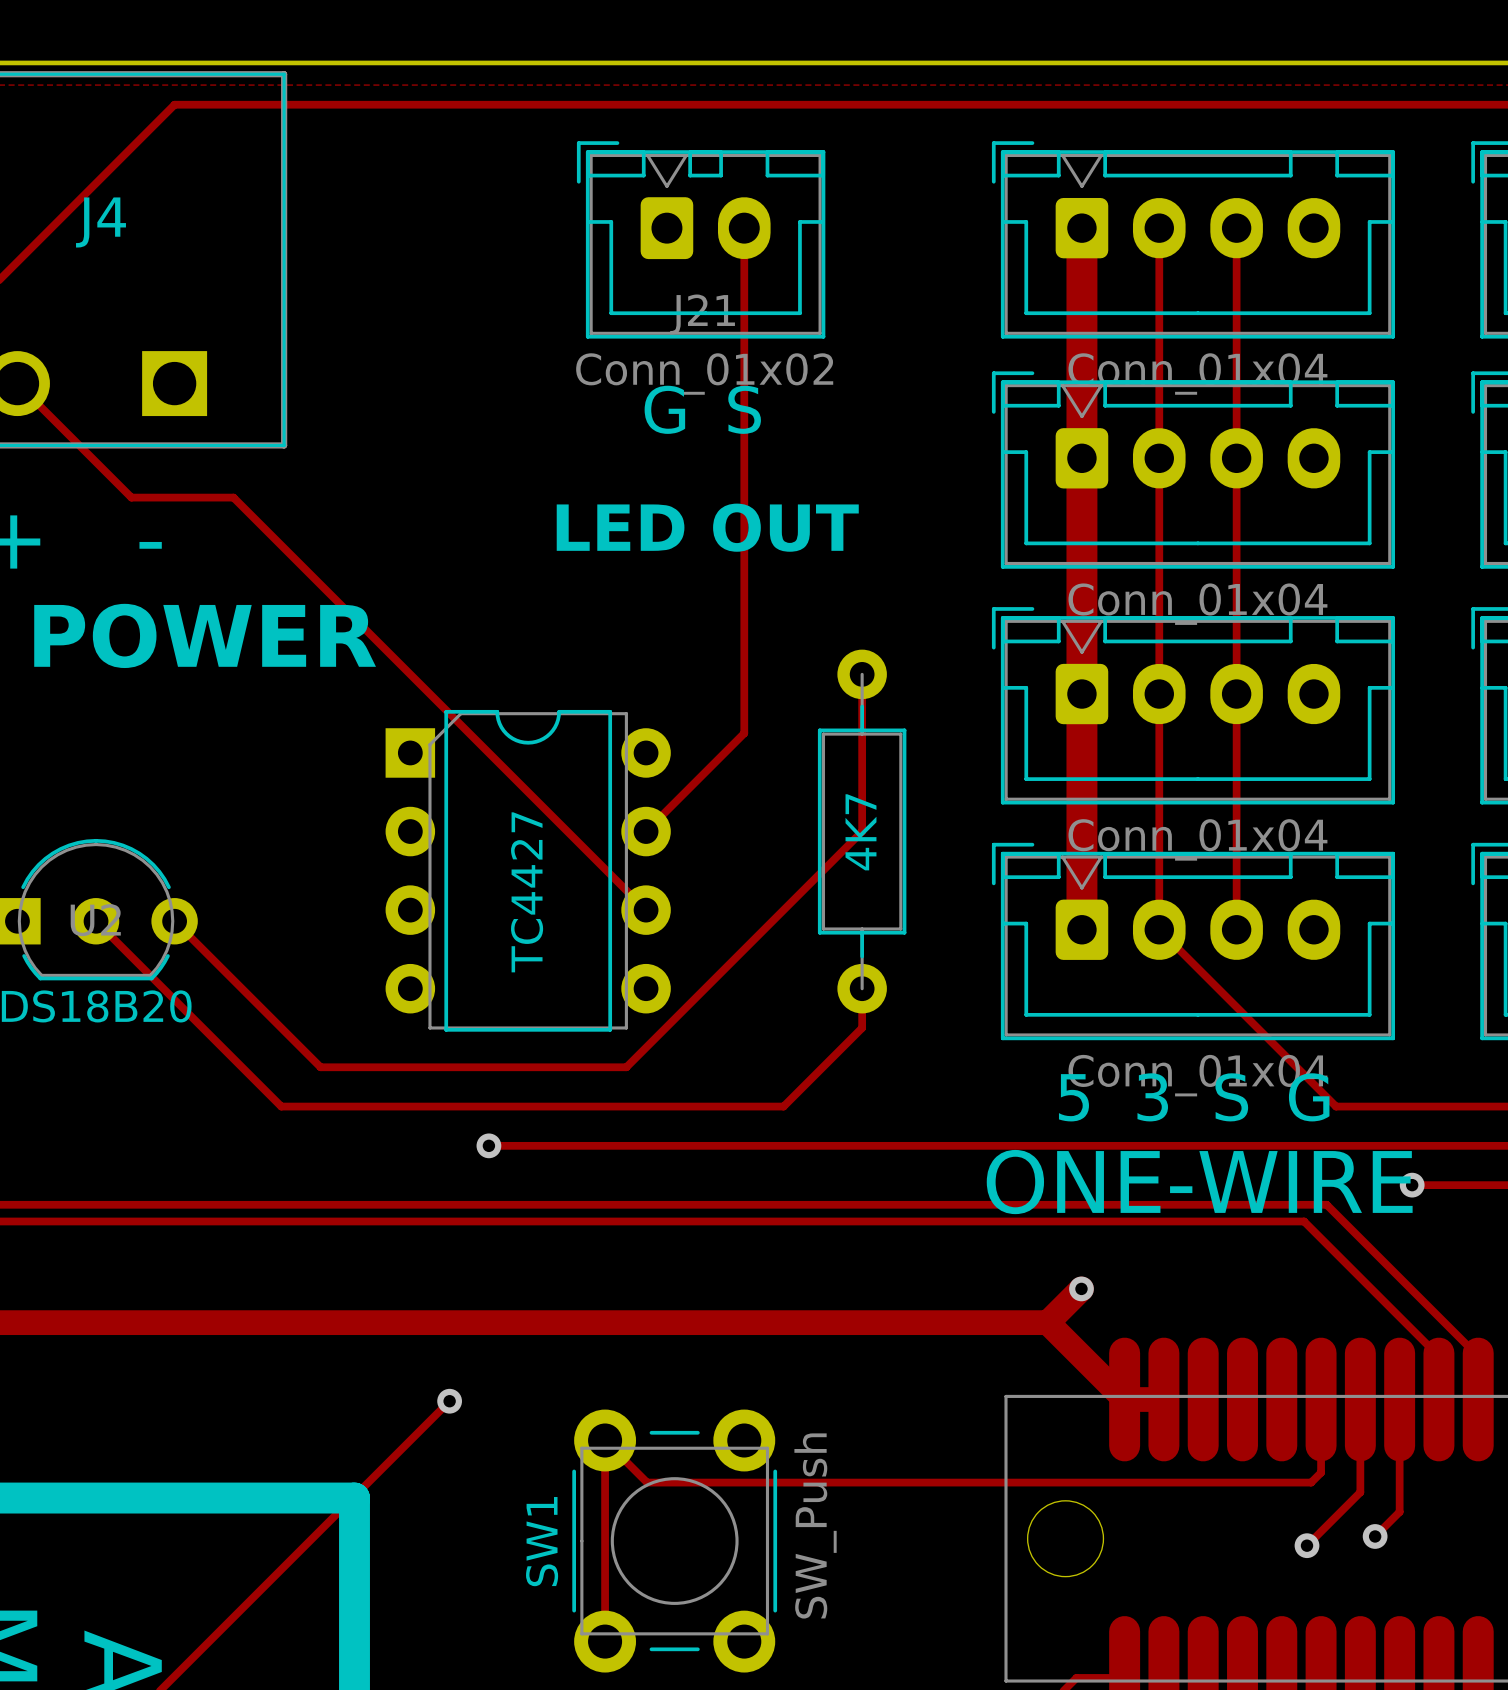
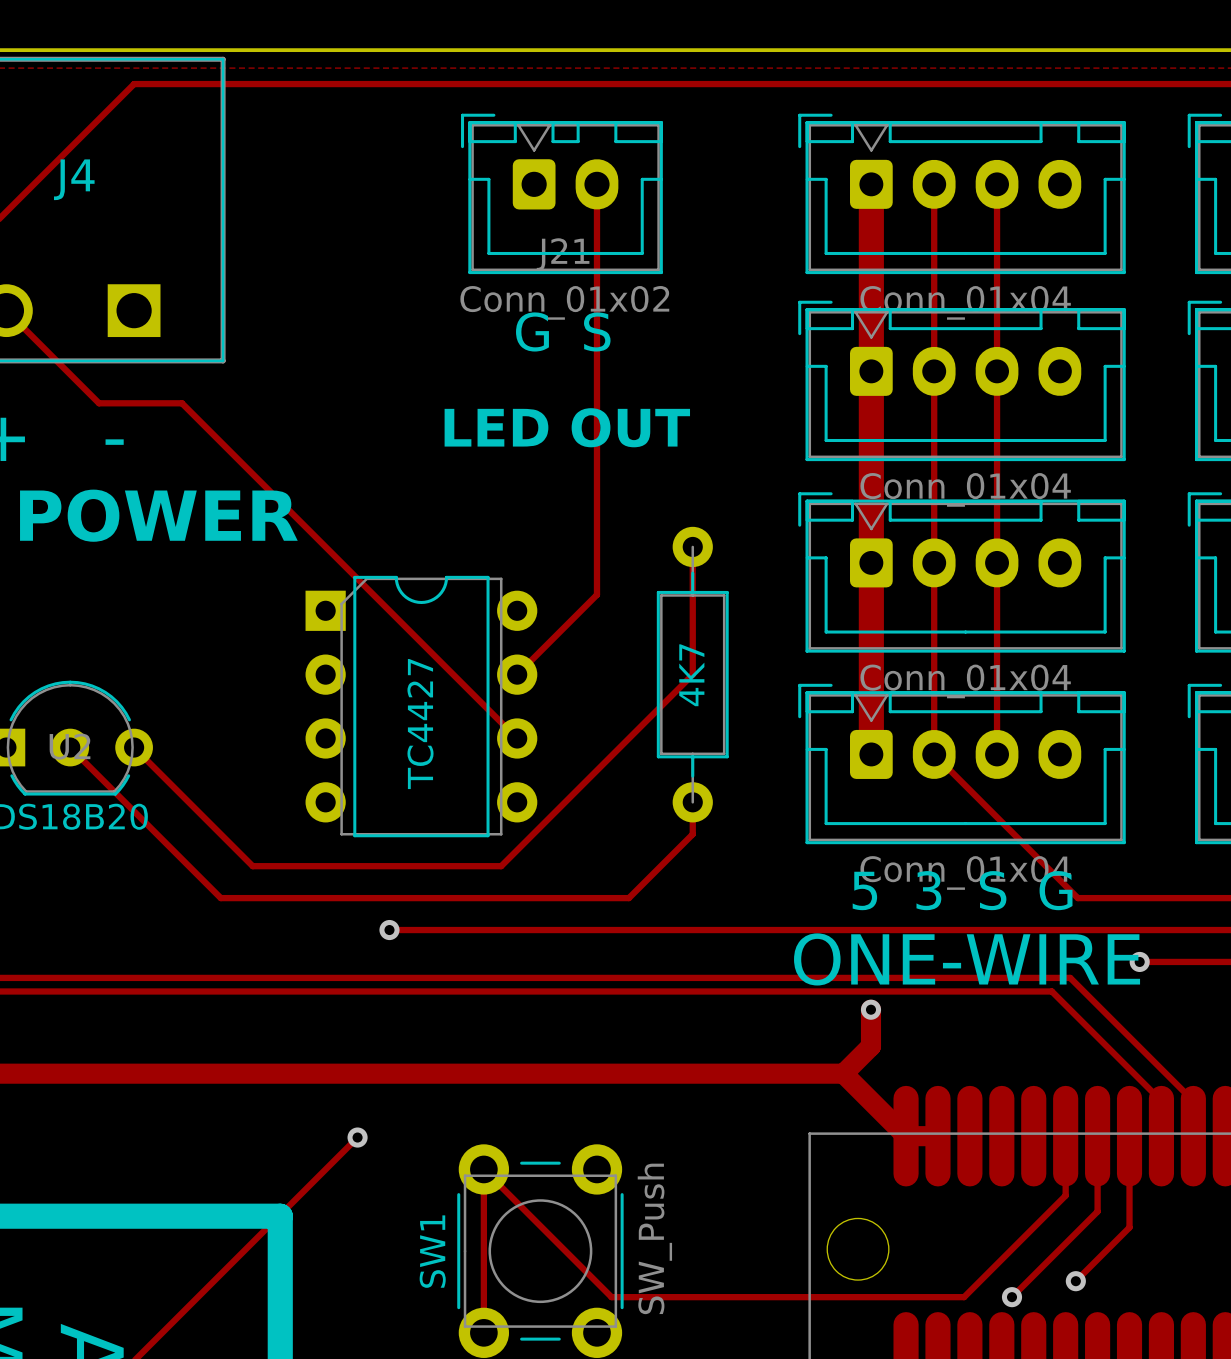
track: none -> (870, 1009) (870, 1046)
via position: (1081, 1288) -> (870, 1009)
track: (647, 1482) (1311, 1482) -> (518, 1203) (611, 1297) (964, 1297) (1057, 1203)
track: none -> (1109, 1247) (1075, 1281)
via: (1375, 1536) -> none
track: none -> (1054, 1254) (1012, 1297)
via: (1307, 1545) -> none
via: none -> (1075, 1281)
via: none -> (1012, 1297)

